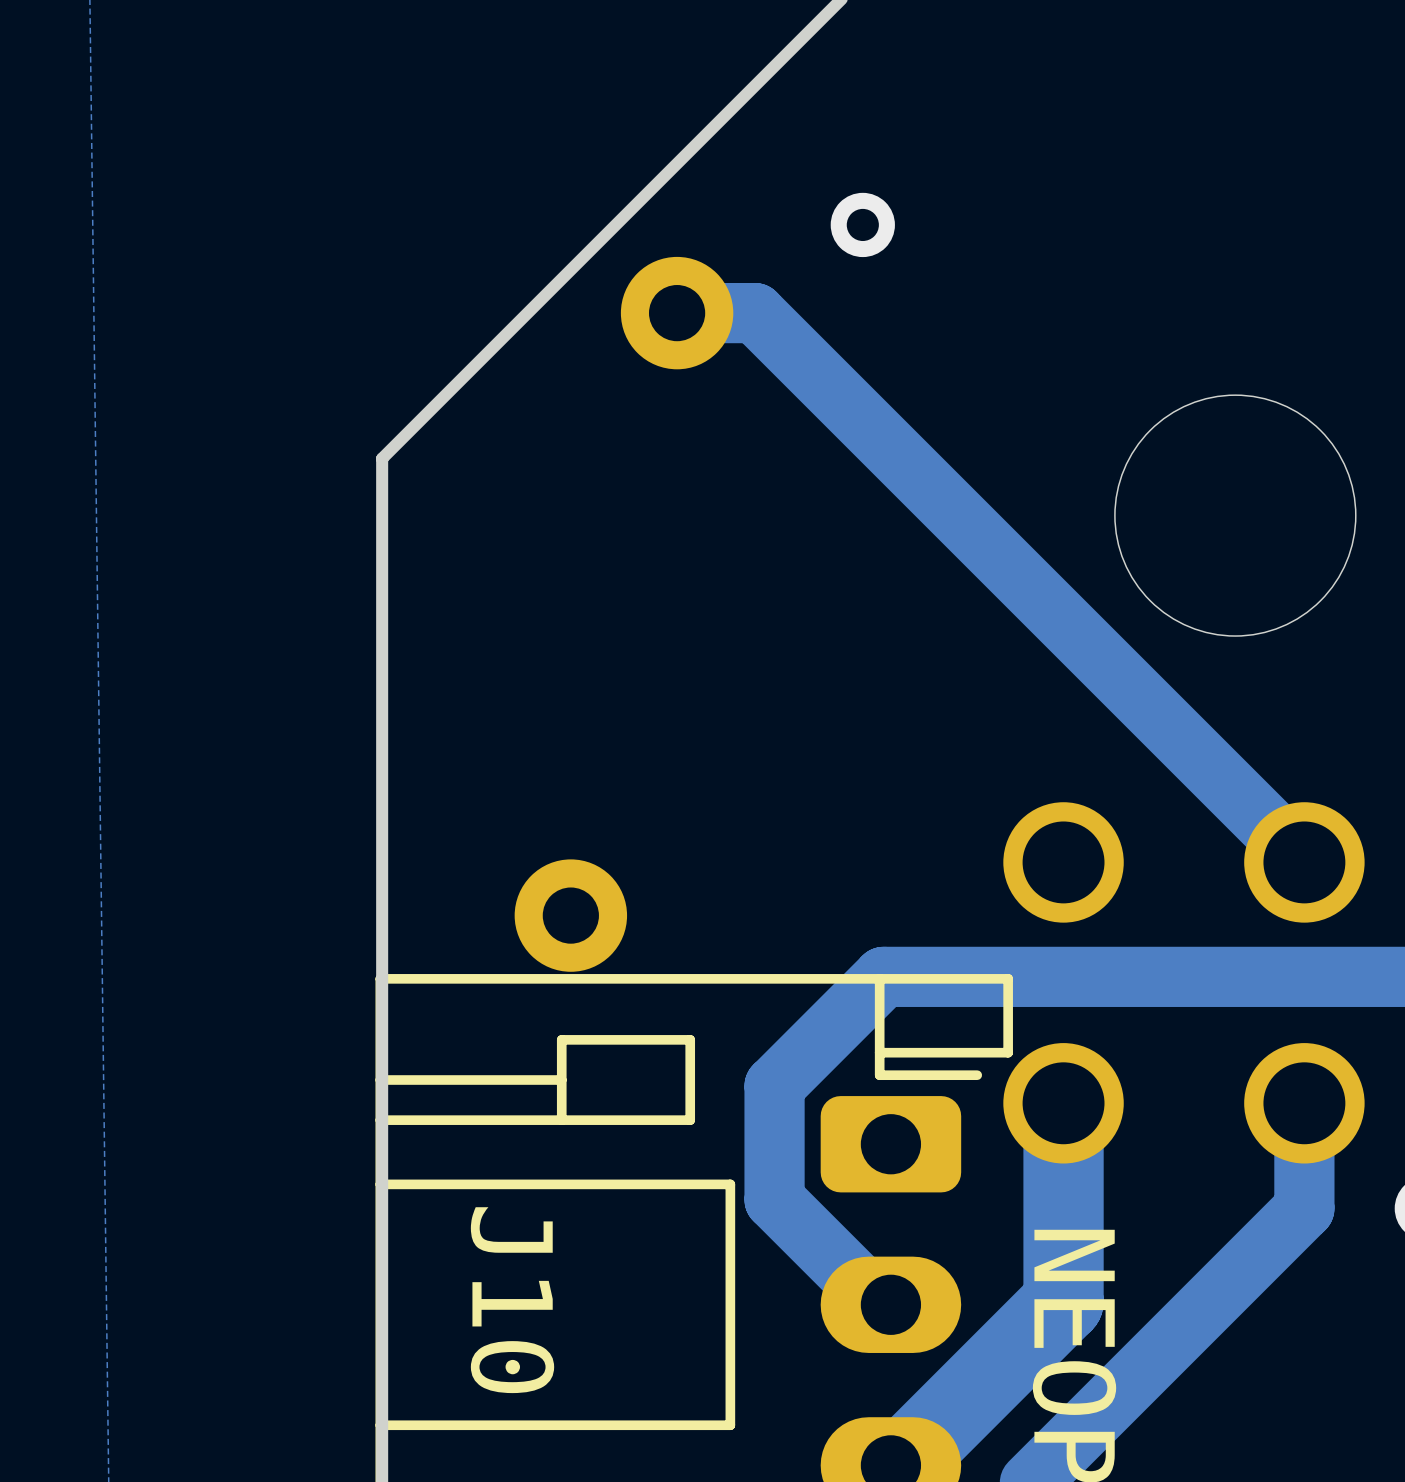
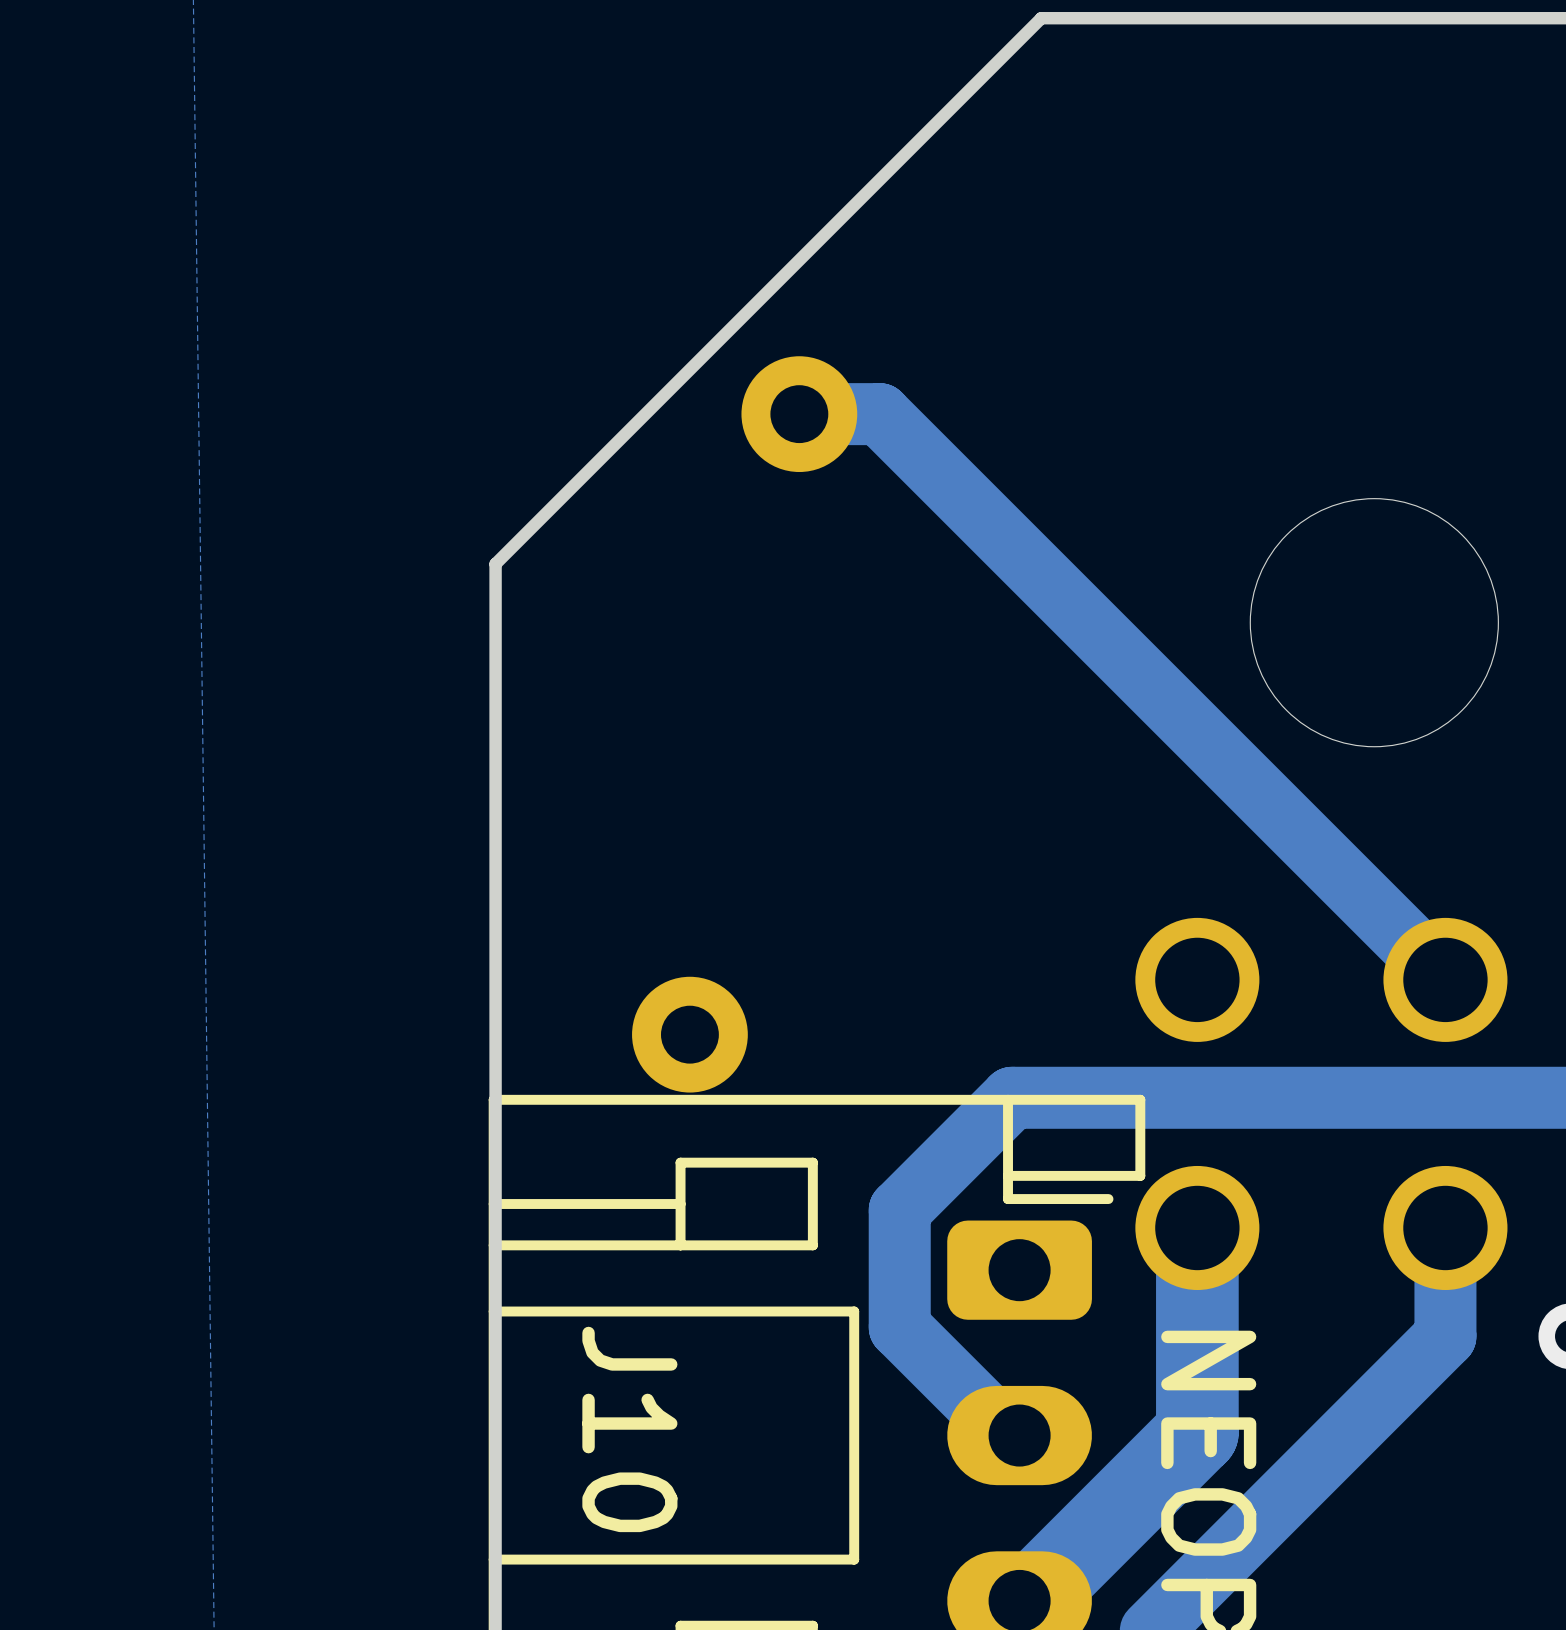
via: (862, 224) -> none

